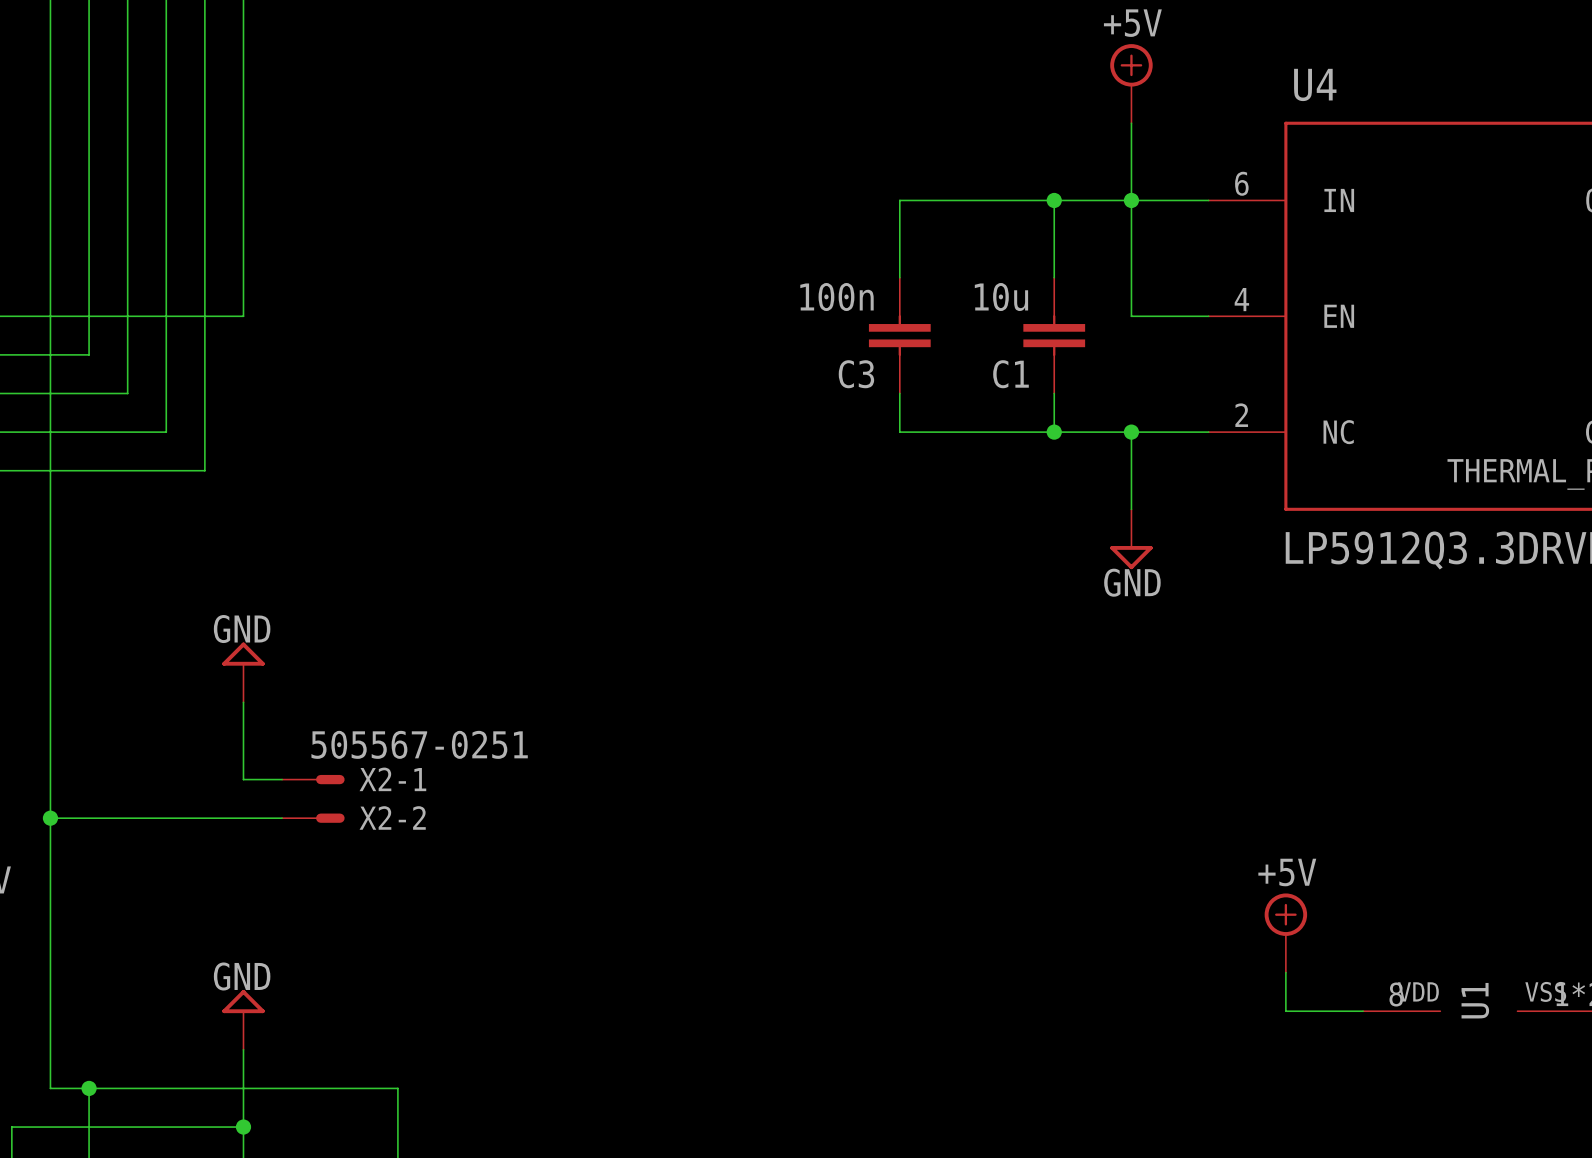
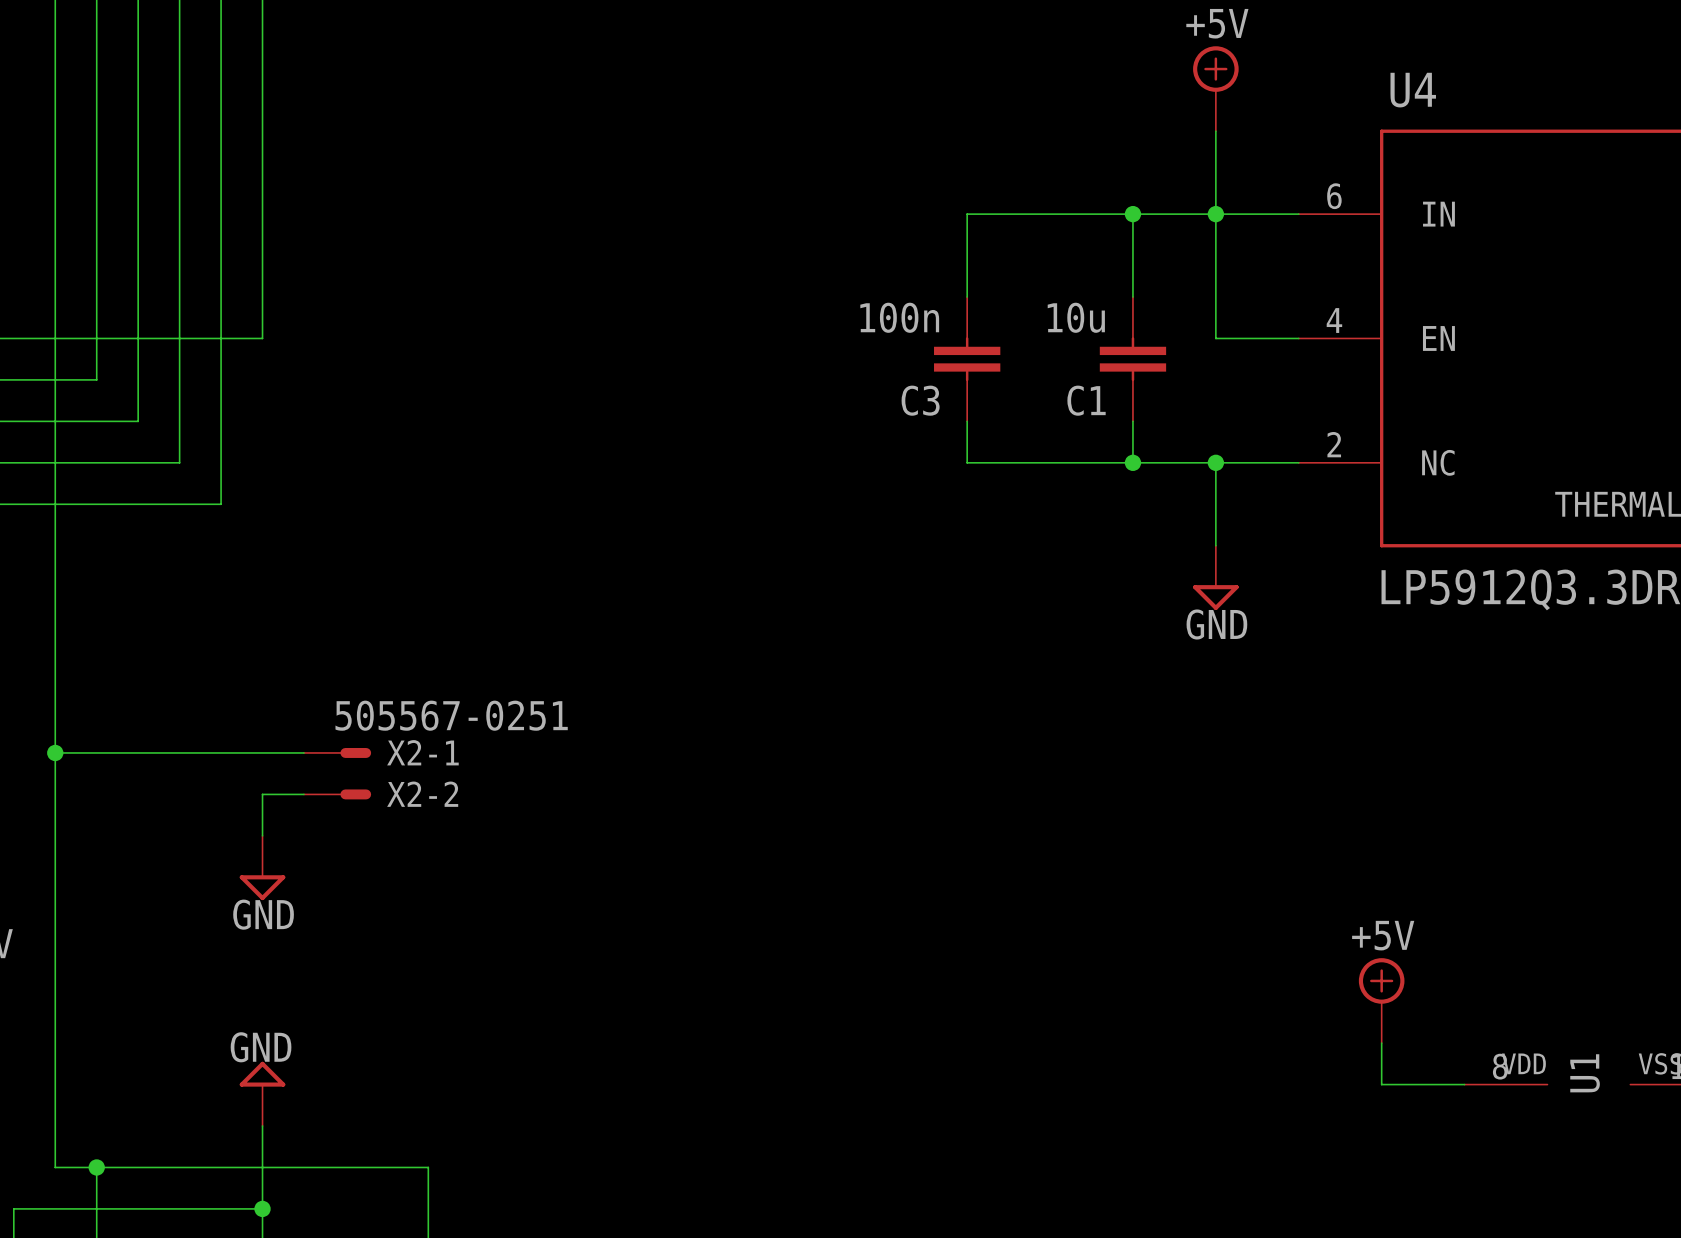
power symbol rotation: 0° (243, 654) -> 180° (262, 887)
power symbol position: GND (243, 672) -> GND (262, 868)
junction: none -> (55, 752)
wire: (243, 702) (243, 740) -> (303, 794) (262, 794)
wire: (243, 779) (282, 779) -> none
X2-1 position: (313, 779) -> (337, 752)
wire: (50, 818) (282, 818) -> (55, 752) (303, 752)
junction: (50, 818) -> none
X2-2 position: (313, 818) -> (337, 794)

